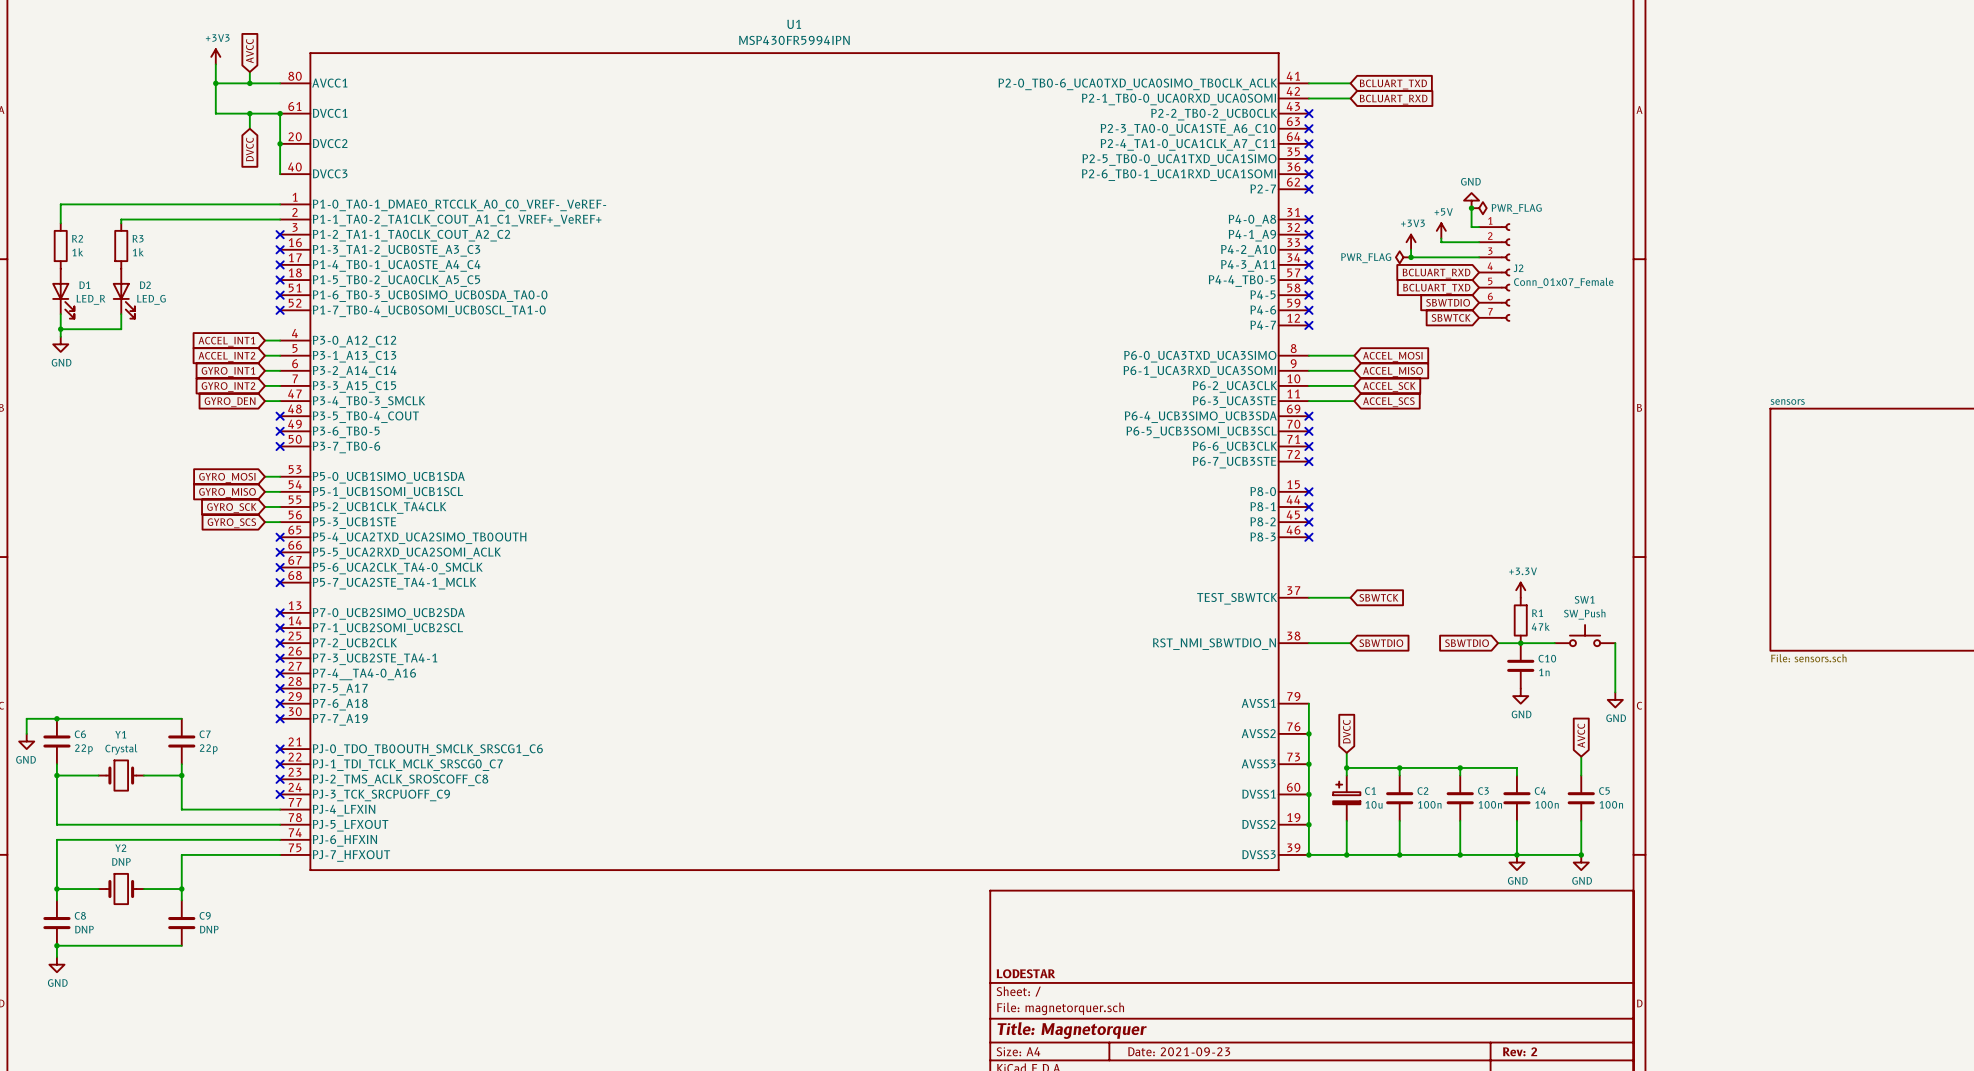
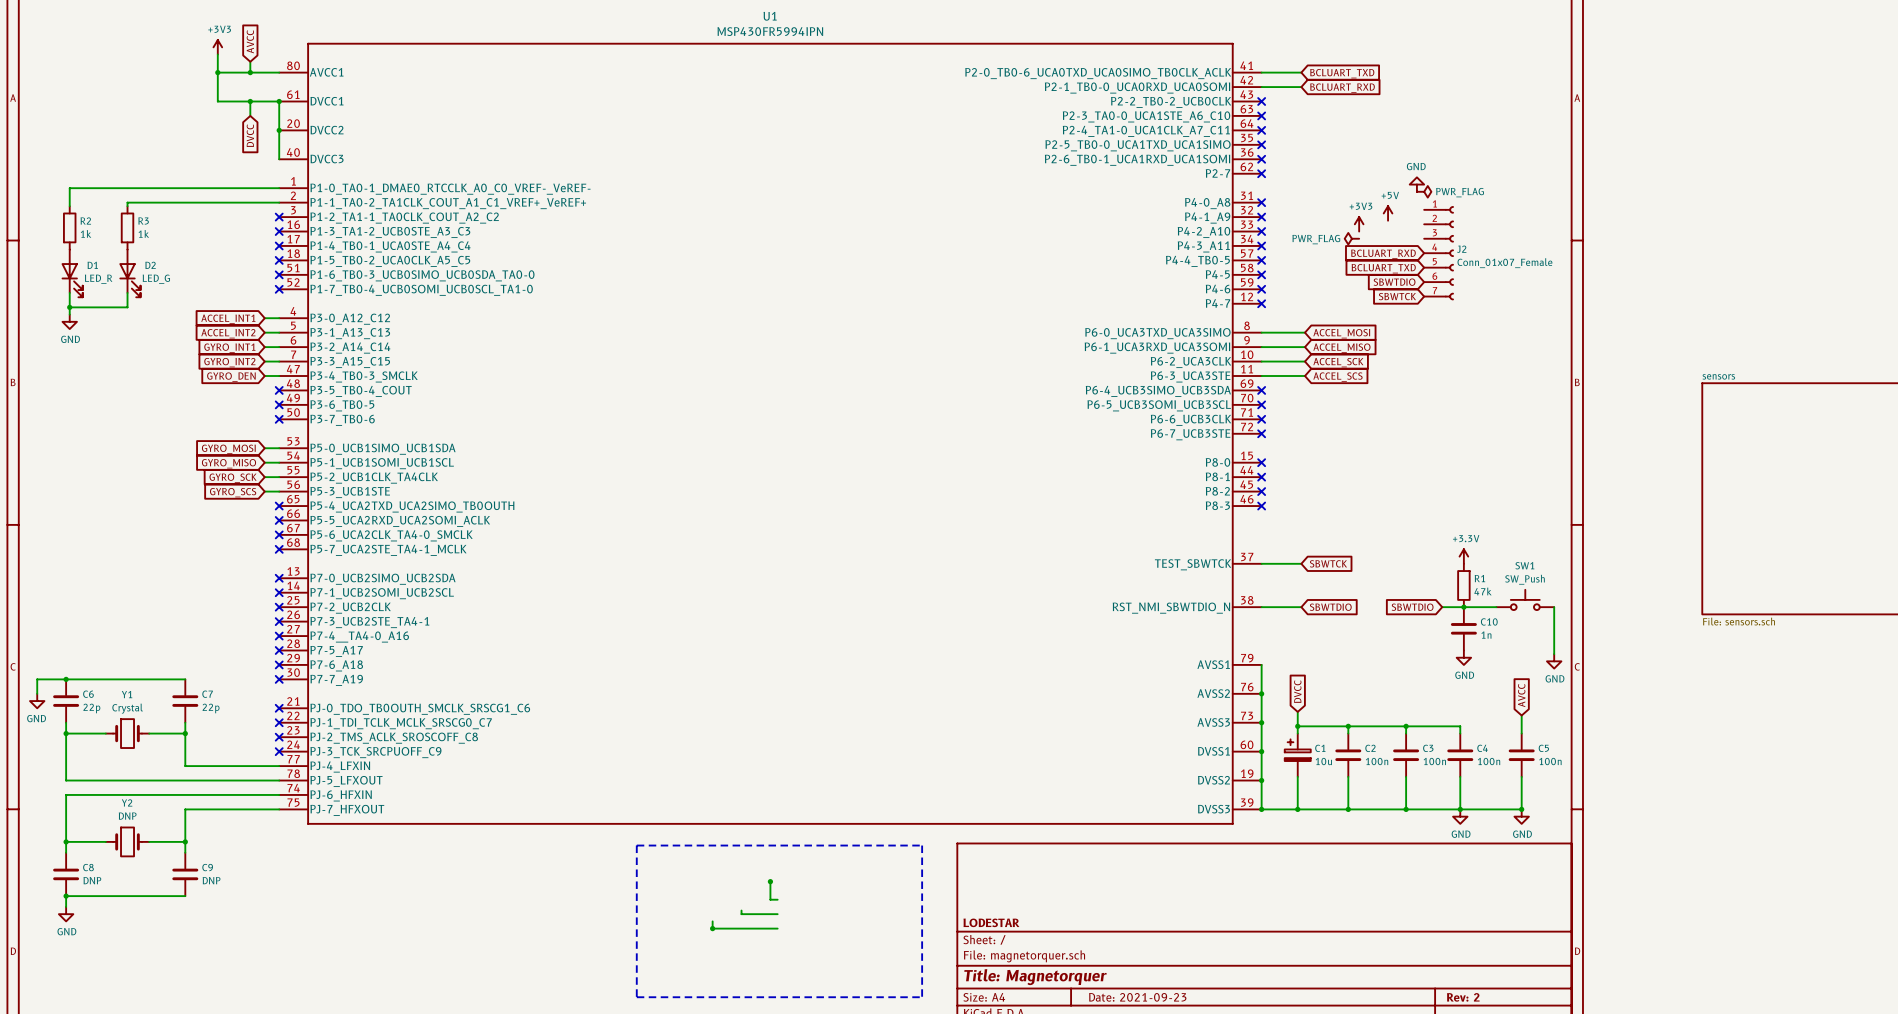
wire: (1471, 208) (1471, 227) (1479, 227) -> none
junction: (1471, 208) -> none
wire: (1441, 238) (1441, 242) (1479, 242) -> none
wire: (1411, 249) (1411, 257) (1479, 257) -> none
junction: (1411, 257) -> none
line: none -> (636, 845) (636, 997) (922, 997) (922, 845) (636, 845)
wire: none -> (770, 881) (770, 899) (777, 899)
junction: none -> (770, 881)
wire: none -> (741, 910) (741, 914) (777, 914)
wire: none -> (712, 921) (712, 928) (777, 928)
junction: none -> (712, 928)

